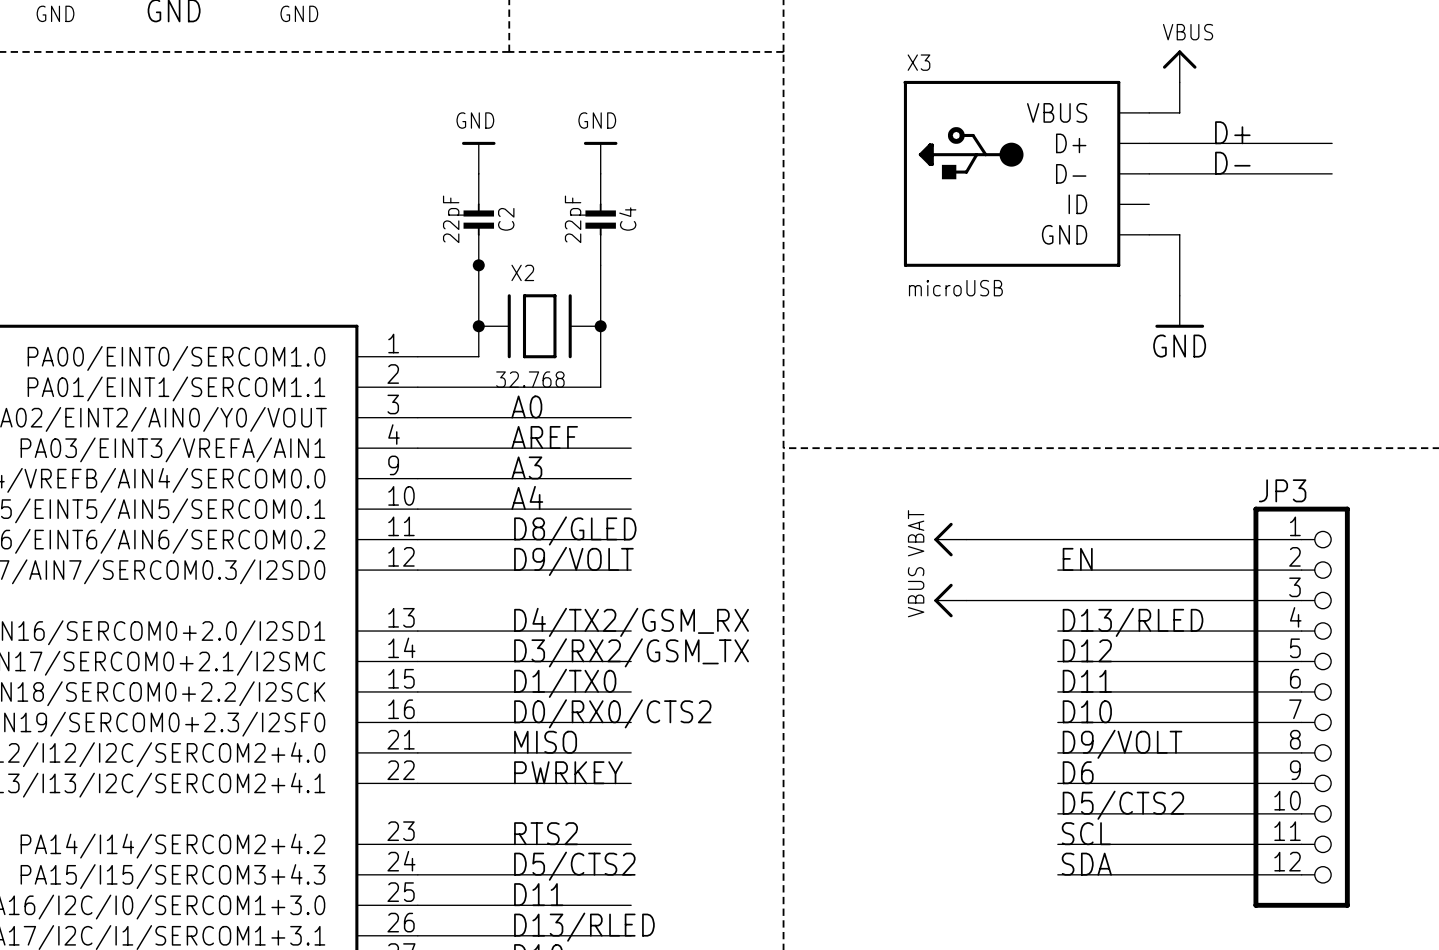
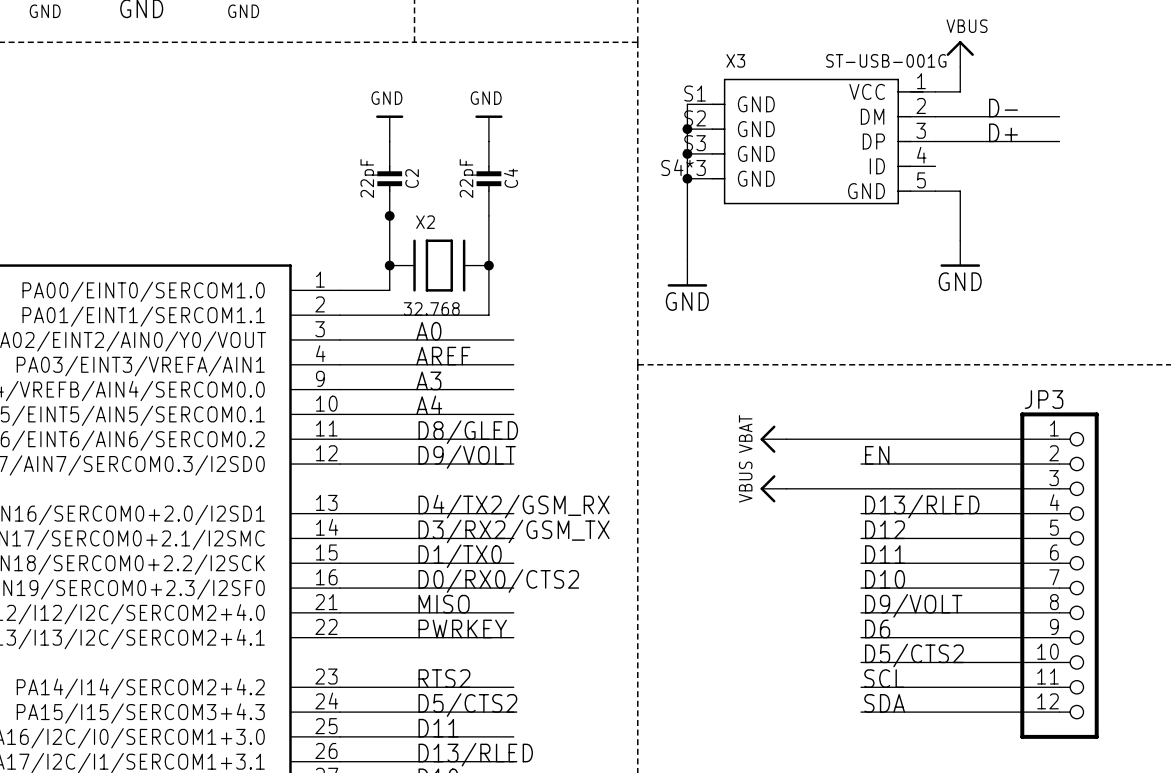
X3 symbol: [903, 80, 1150, 267] -> [687, 78, 936, 205]
wire: none -> (687, 104) (687, 260)
label: D+ (1232, 132) -> D- (1003, 108)
wire: (1301, 143) (1332, 143) -> none
junction: none -> (687, 129)
label: D- (1232, 163) -> D+ (1003, 132)
wire: (1301, 173) (1332, 173) -> none
junction: none -> (687, 153)
junction: none -> (687, 178)
X3 value: microUSB (955, 288) -> ST-USB-001G (886, 60)
power symbol: none -> GND (687, 273)

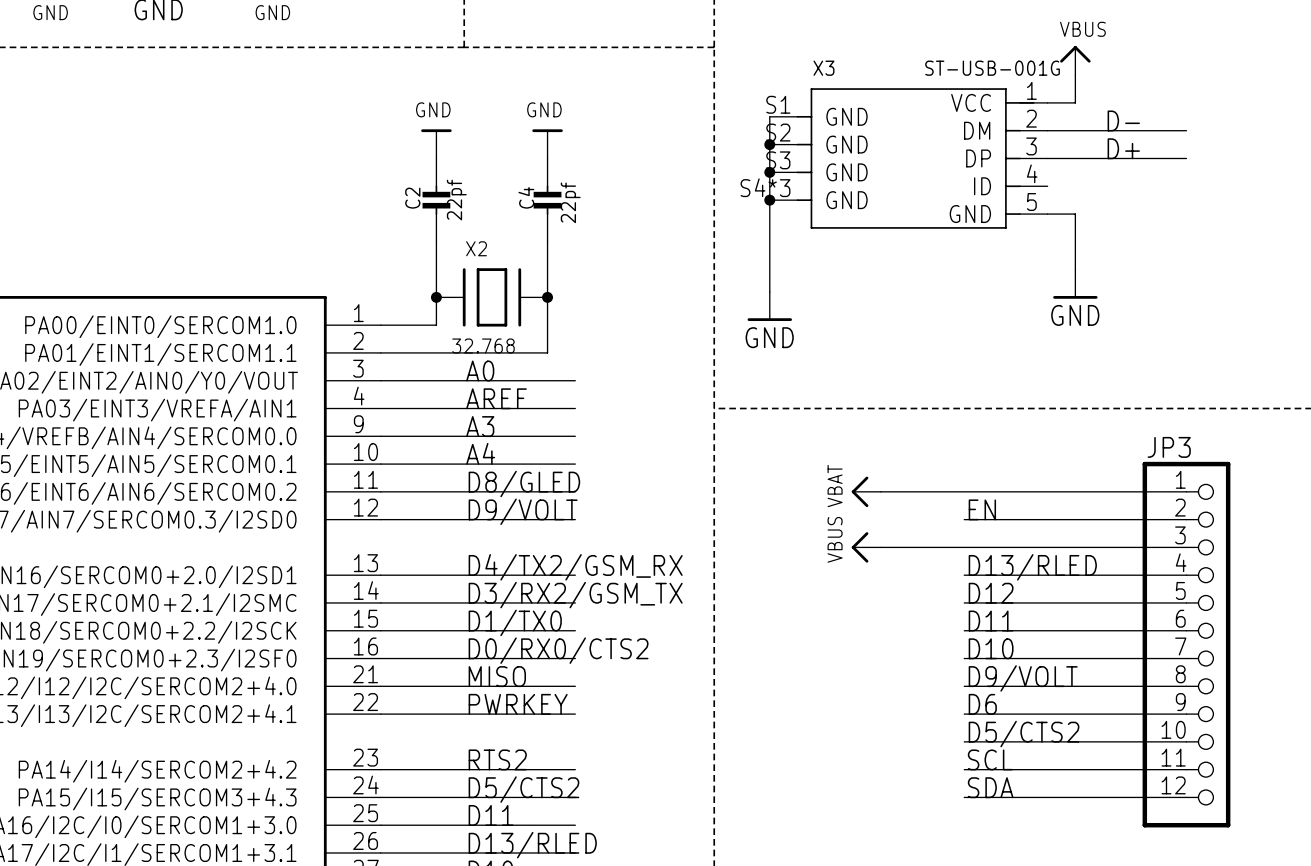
C2 value: 22pF (369, 178) -> 22pf (456, 200)
C2 name position: C2 (412, 178) -> C2 (412, 198)
C4 value: 22pF (468, 178) -> 22pf (570, 202)
C4 name position: C4 (511, 178) -> C4 (526, 197)
junction: (389, 215) -> none

